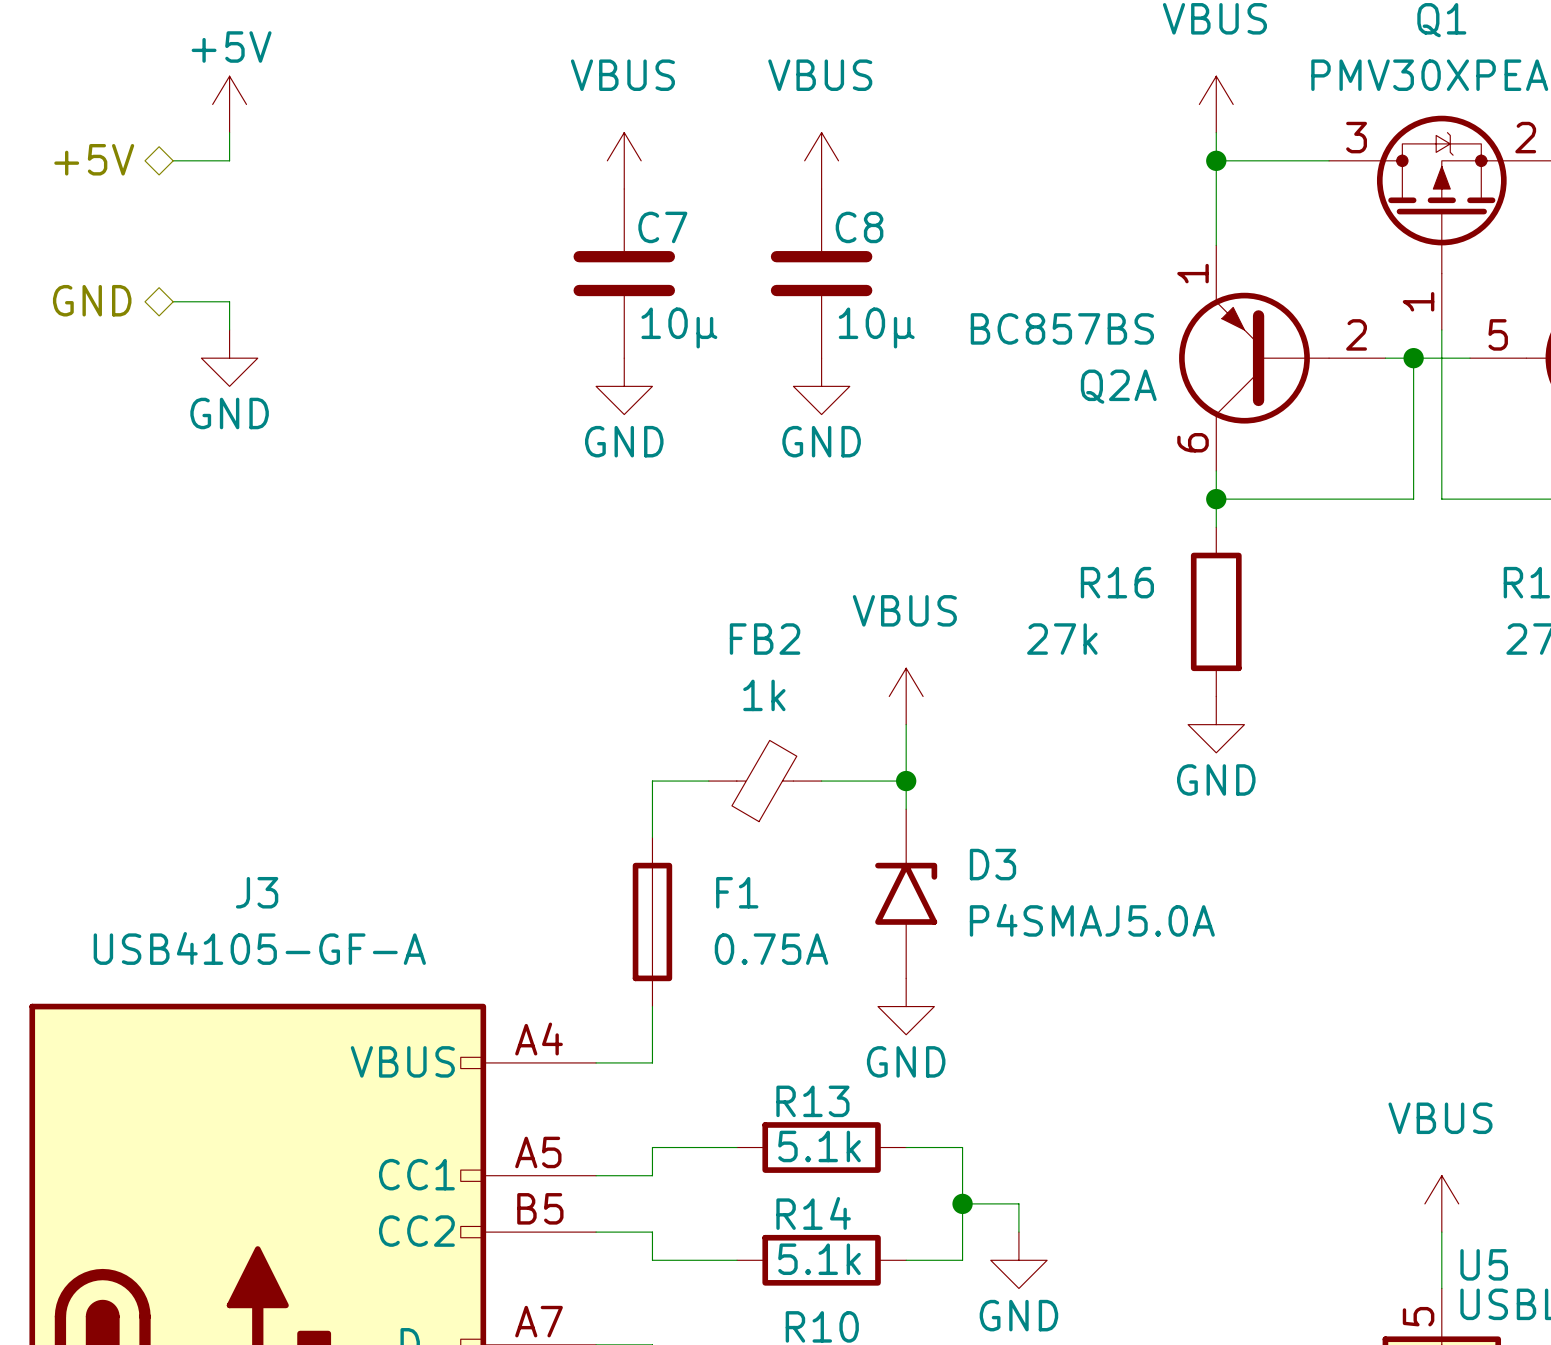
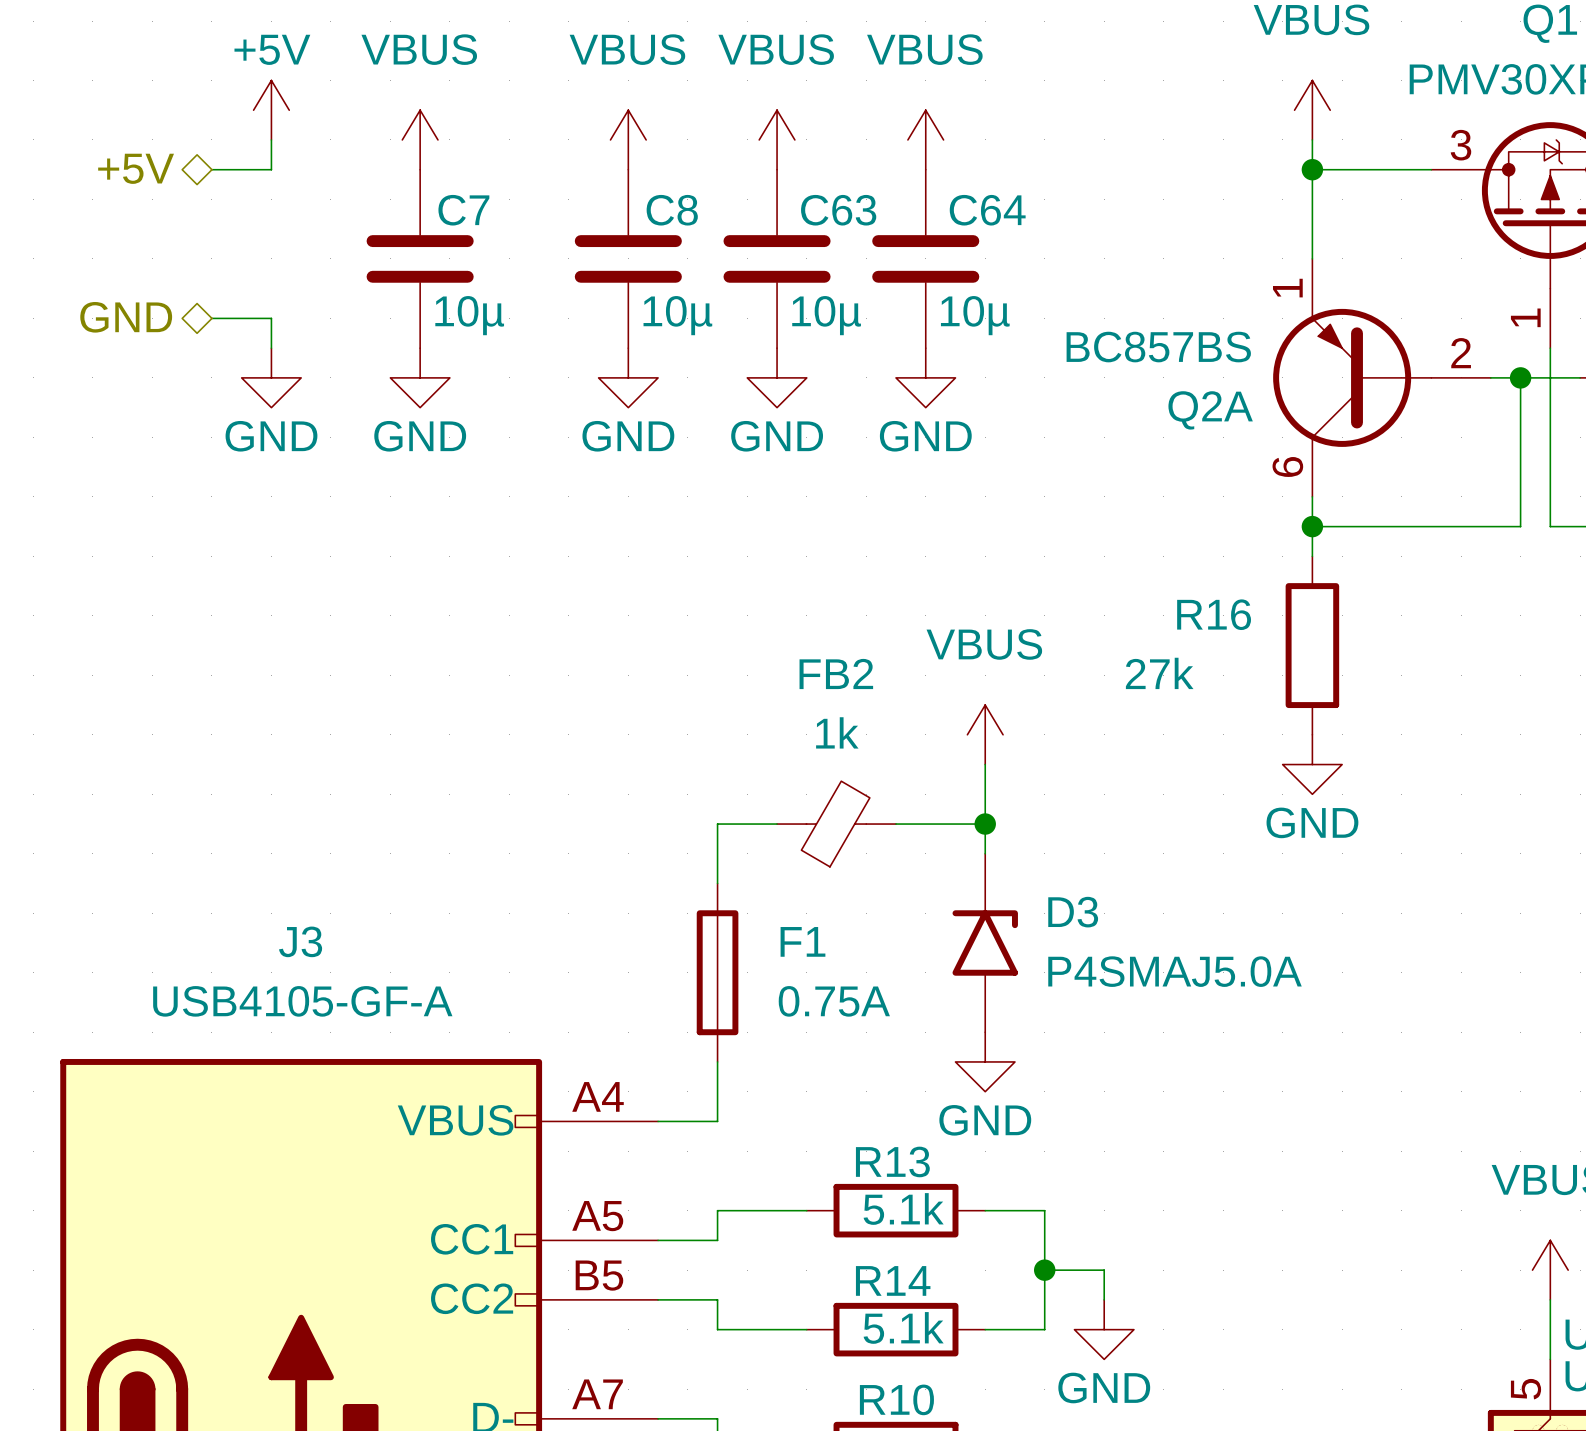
power symbol: none -> VBUS (420, 139)
power symbol: none -> VBUS (628, 139)
power symbol: none -> VBUS (777, 139)
power symbol: VBUS (624, 160) -> none
power symbol position: VBUS (821, 160) -> VBUS (925, 139)
C63: none -> 10µ (777, 258)
C64: none -> 10µ (925, 258)
C7 position: (624, 273) -> (420, 258)
C8 position: (821, 273) -> (628, 258)
power symbol: none -> GND (420, 377)
power symbol: none -> GND (628, 377)
power symbol: none -> GND (777, 377)
power symbol: GND (624, 386) -> none
power symbol position: GND (821, 386) -> GND (925, 377)

